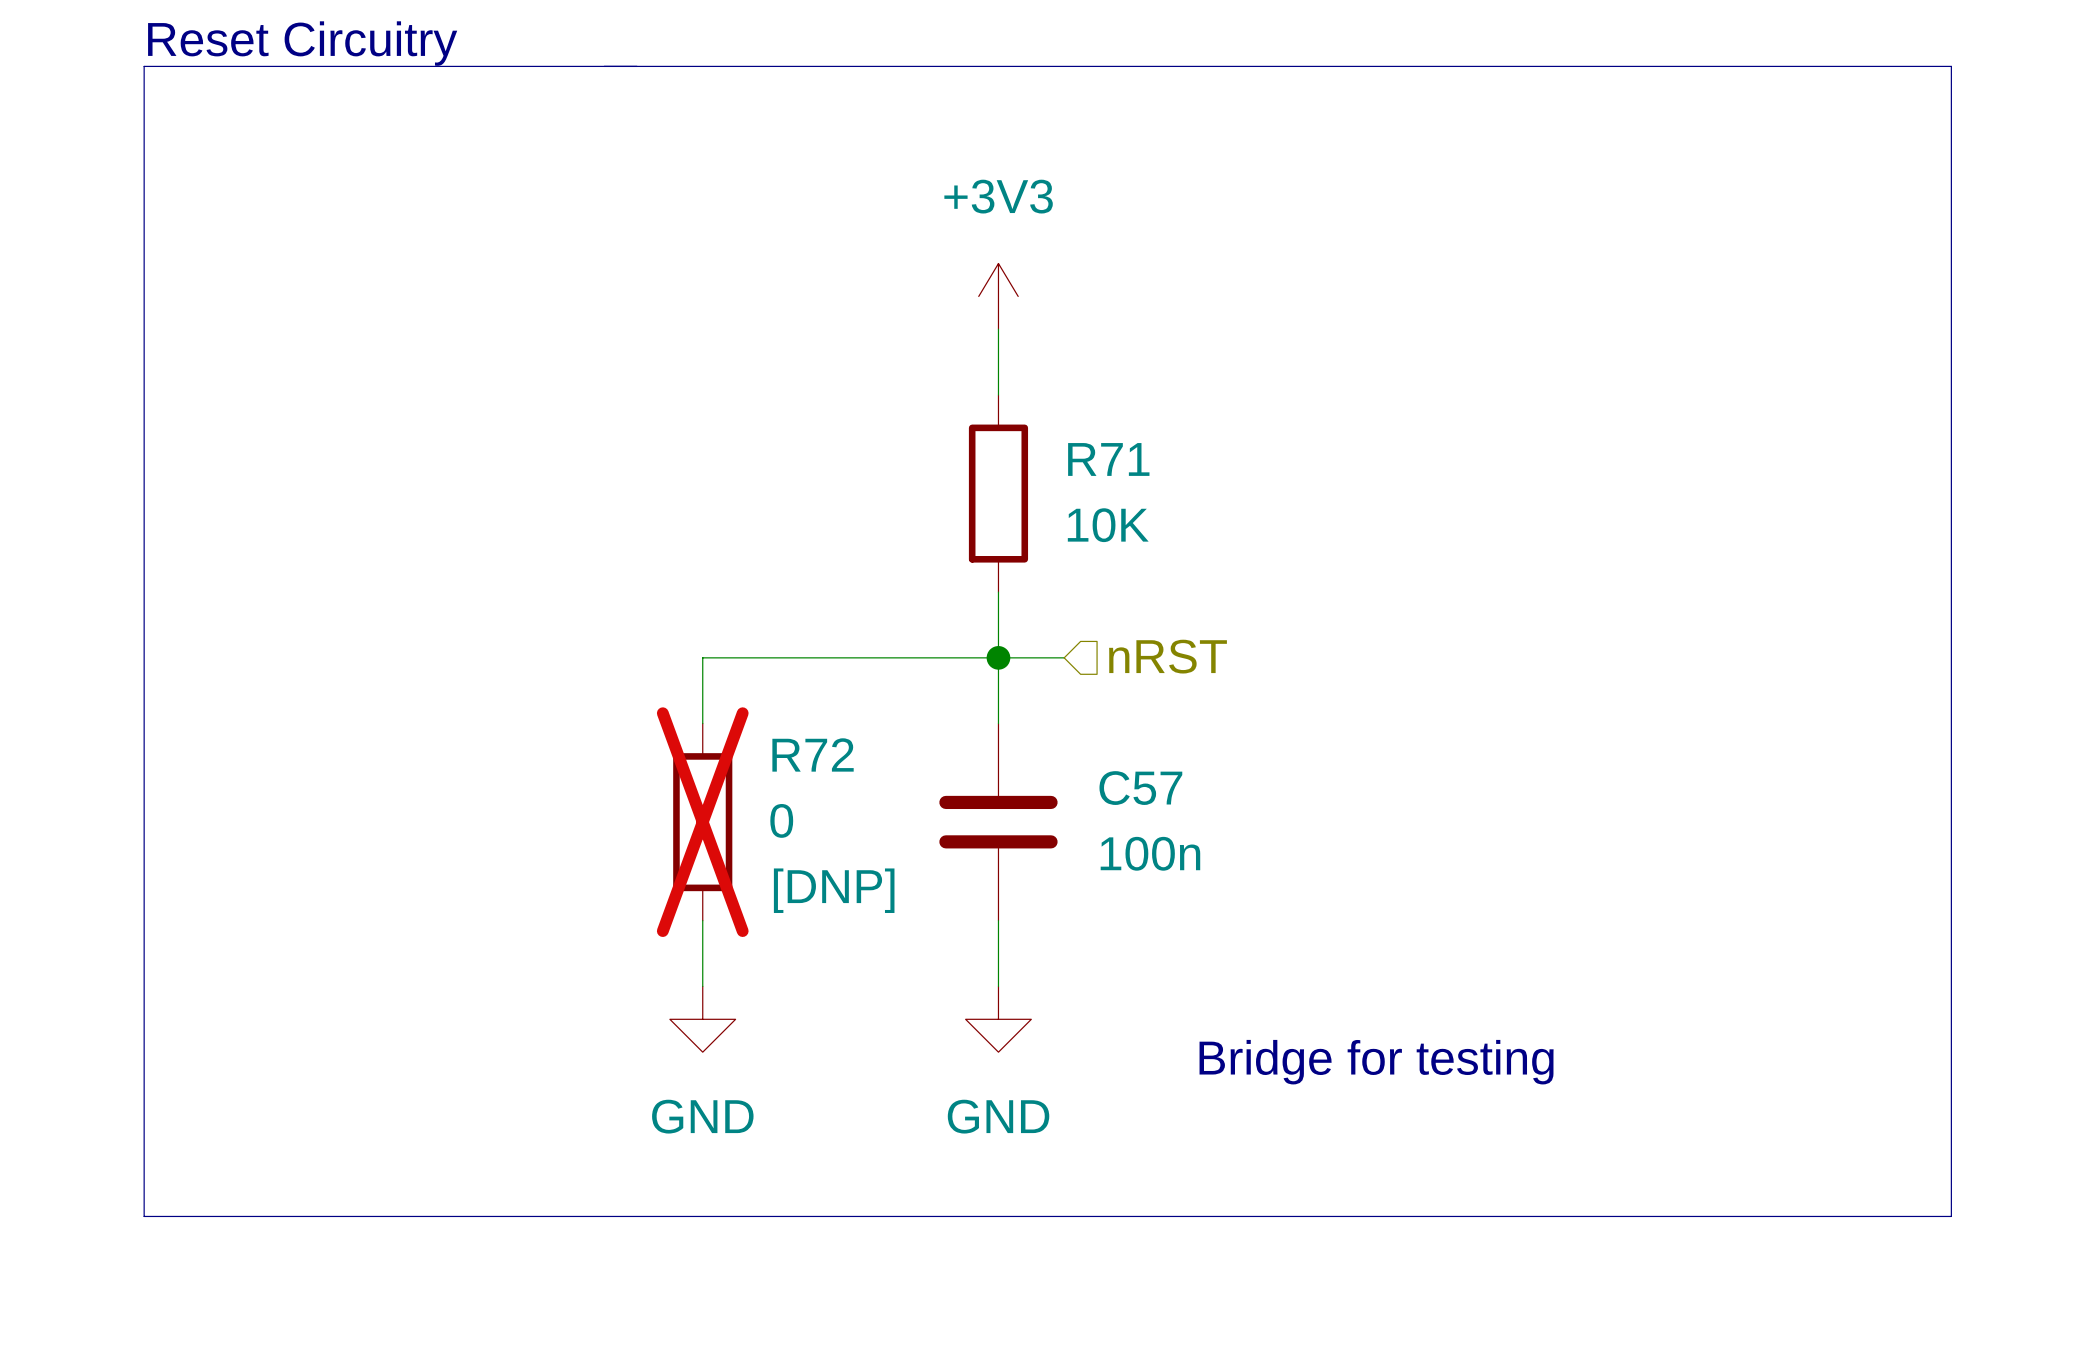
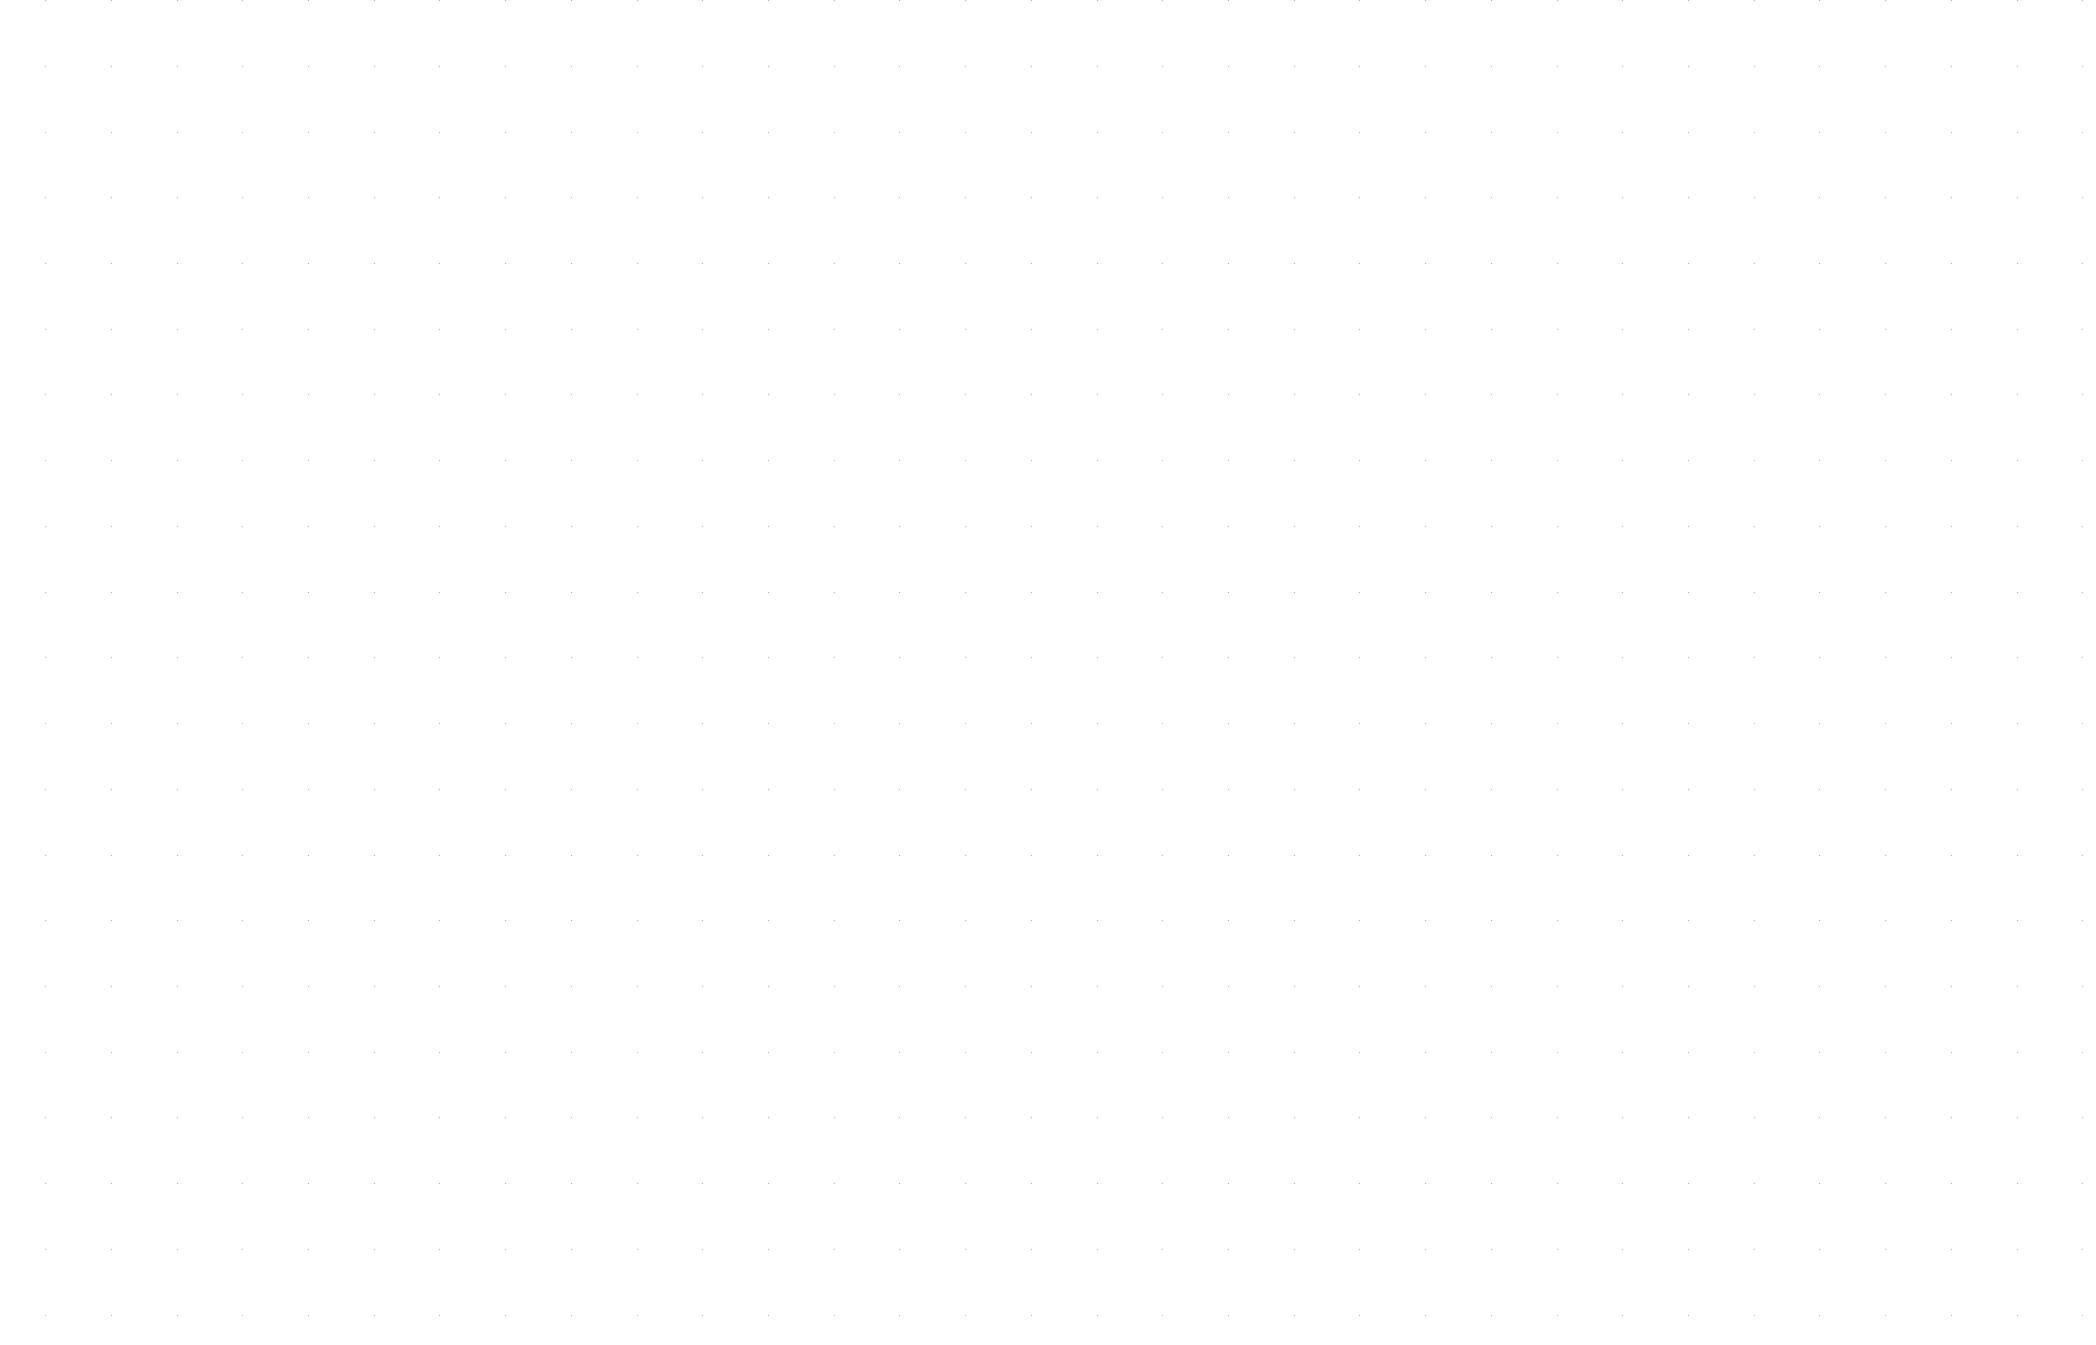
text: Reset Circuitry (302, 43) -> none
line: (144, 66) (1951, 66) (1951, 1216) (144, 1216) (144, 66) -> none
power symbol: +3V3 (998, 296) -> none
wire: (998, 329) (998, 394) -> none
R71: 10K (998, 493) -> none
wire: (998, 592) (998, 723) -> none
hierarchical label: nRST (1168, 656) -> none
junction: (998, 657) -> none
wire: (1064, 657) (702, 657) (702, 723) -> none
R72: 0 (702, 822) -> none
C57: 100n (998, 822) -> none
wire: (702, 920) (702, 986) -> none
wire: (998, 920) (998, 986) -> none
power symbol: GND (702, 1019) -> none
power symbol: GND (998, 1019) -> none
text: Bridge for testing (1376, 1062) -> none

